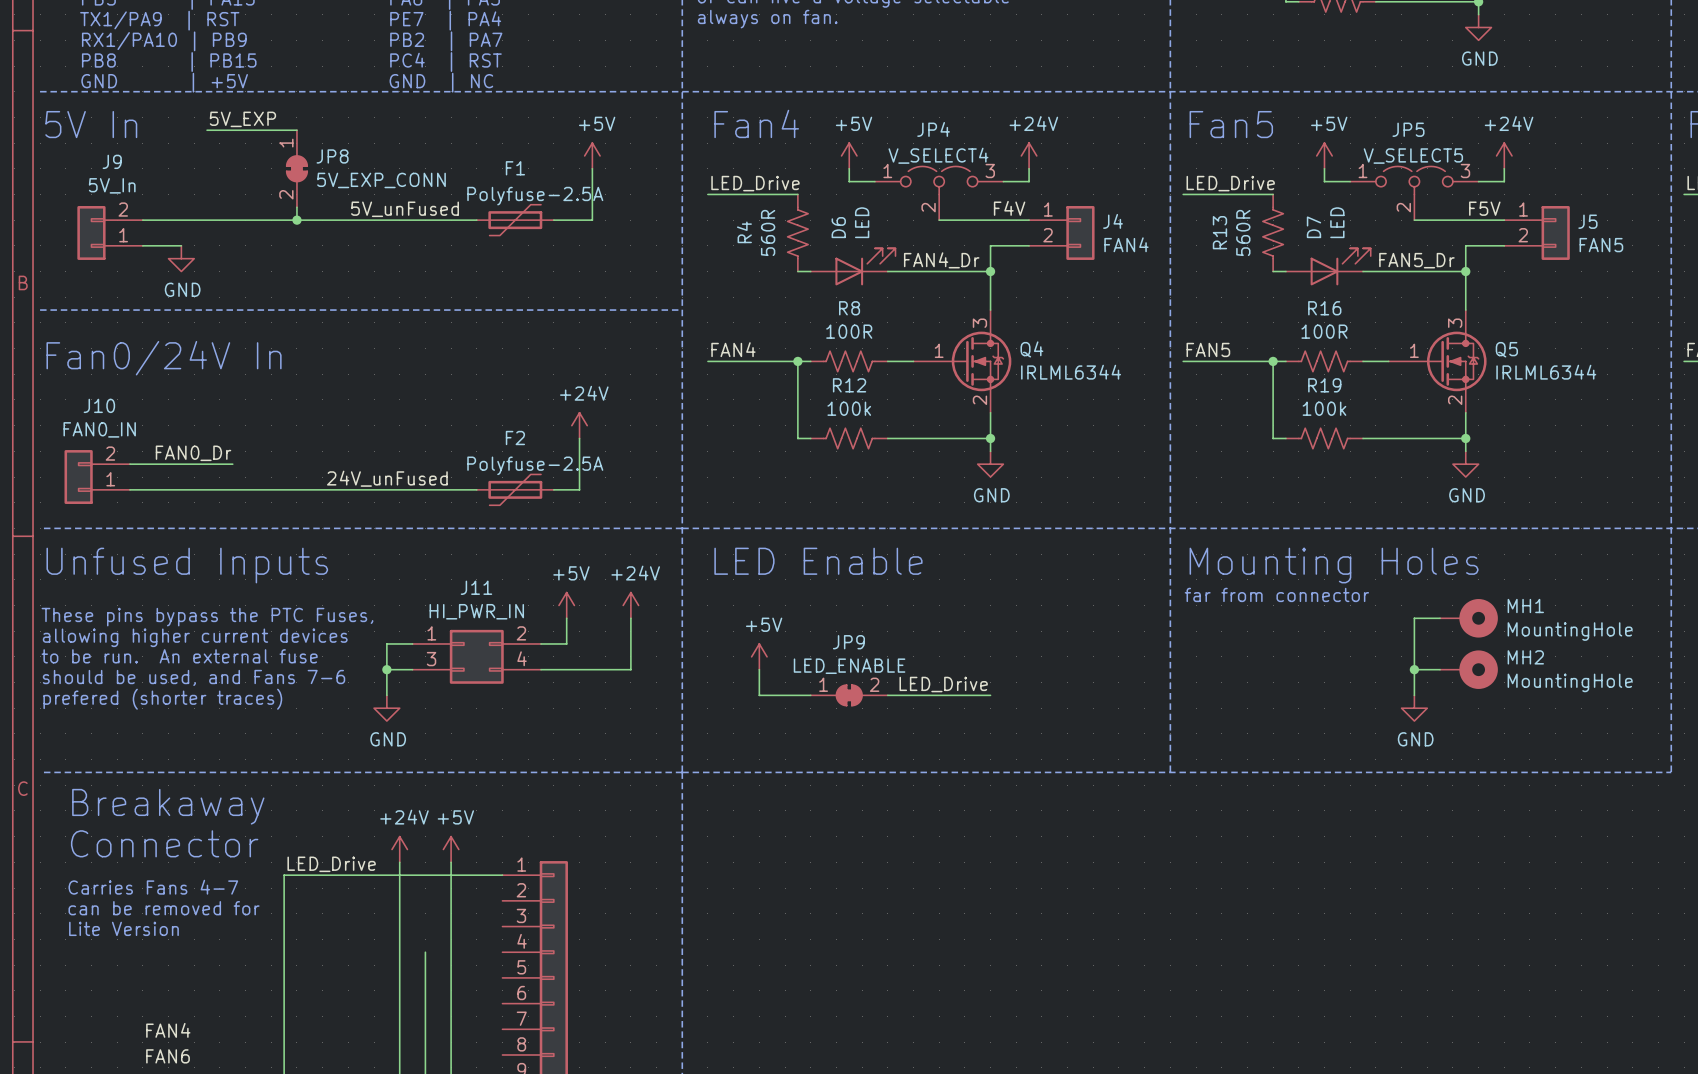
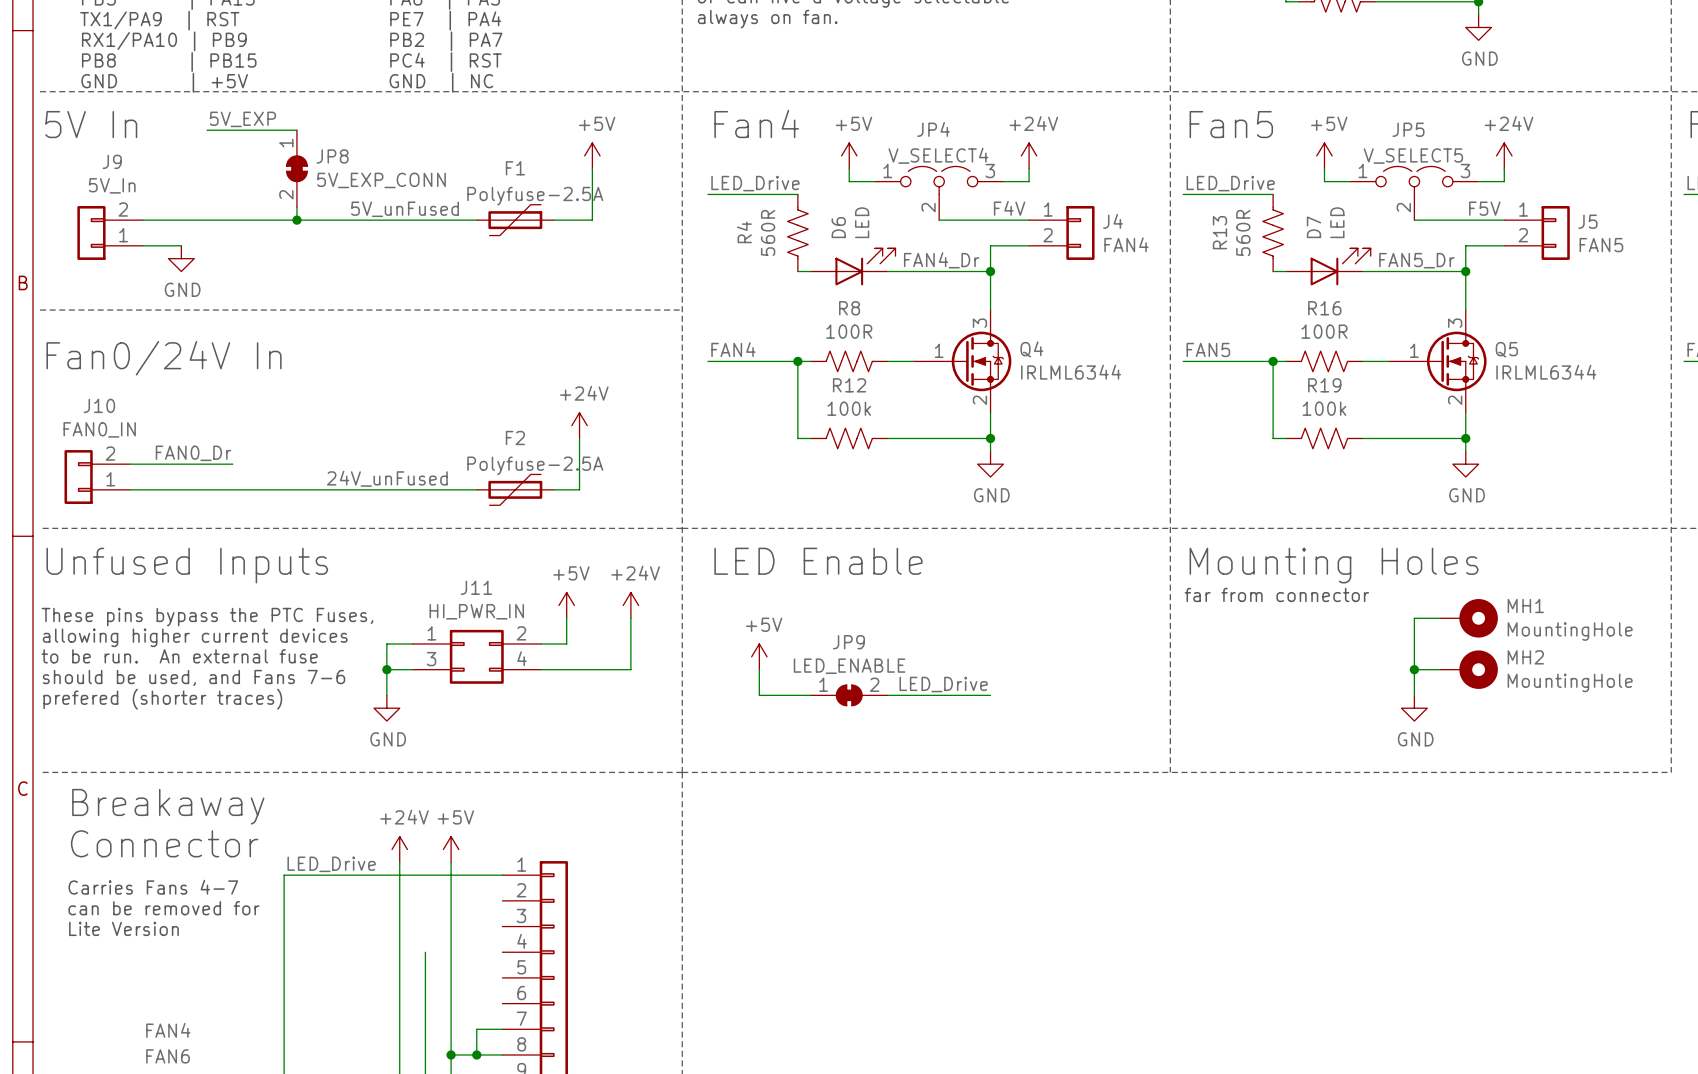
wire: none -> (502, 1029) (476, 1029) (476, 1054)
wire: none -> (451, 1054) (502, 1054)
junction: none -> (451, 1054)
junction: none -> (476, 1054)

